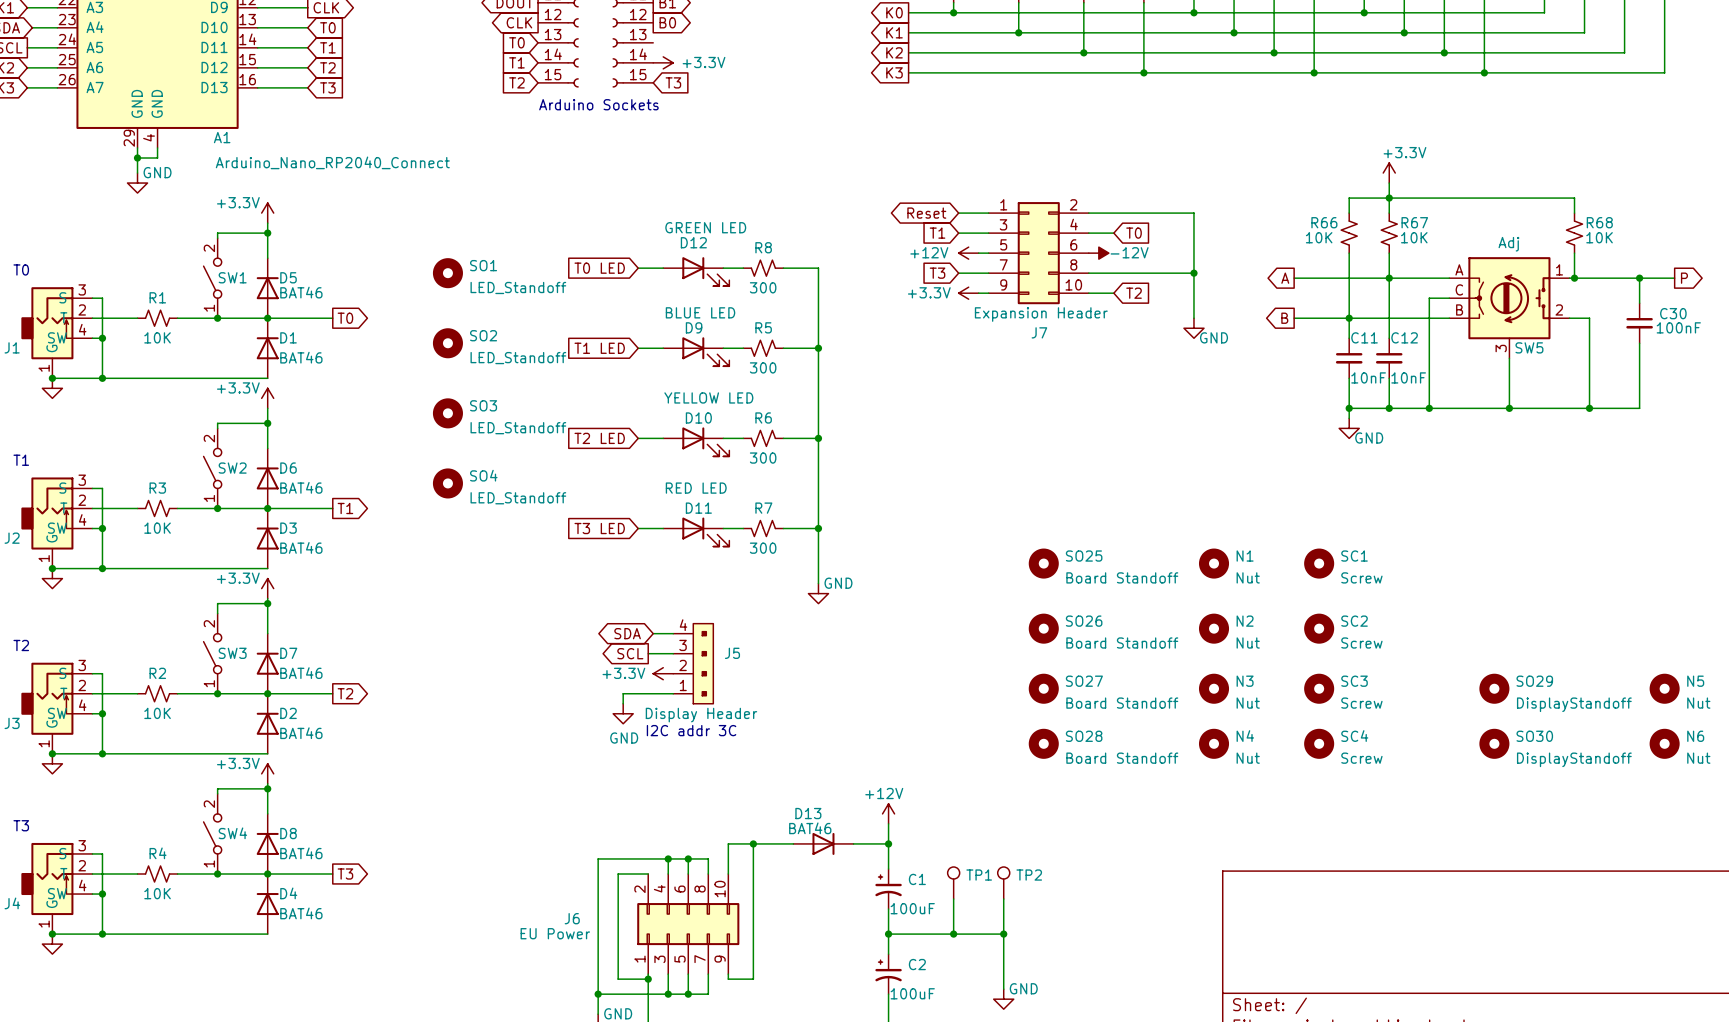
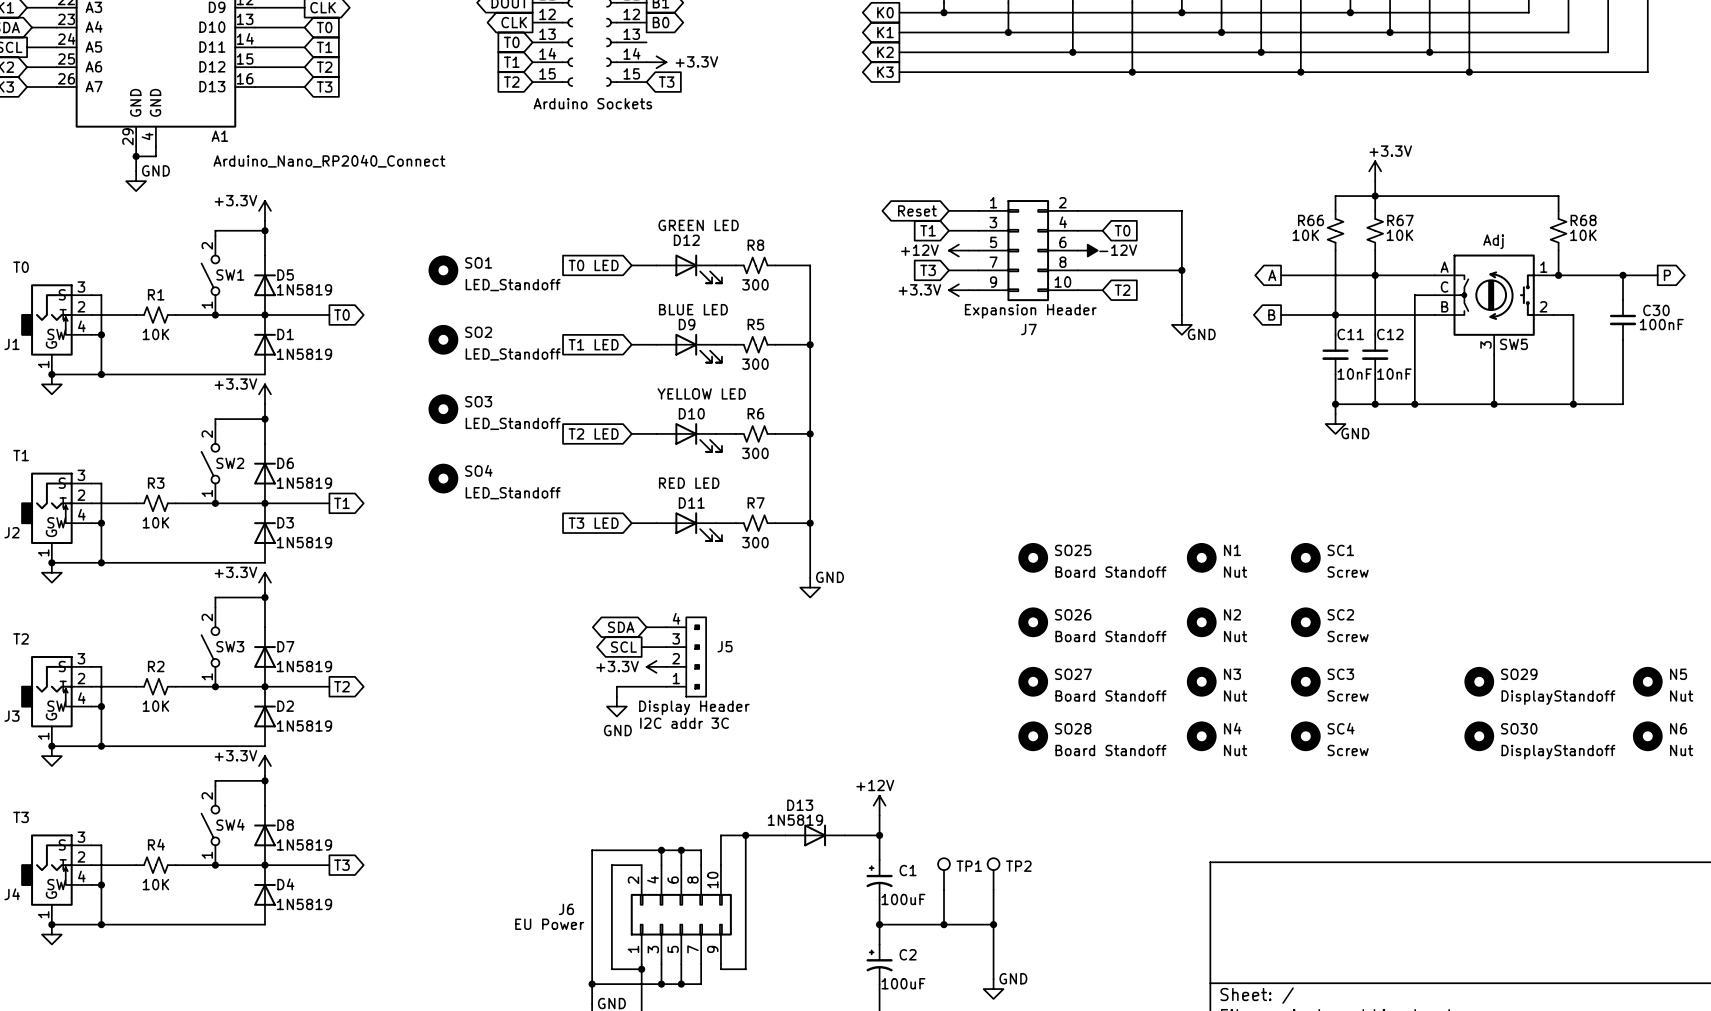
D5 value: BAT46 (301, 292) -> 1N5819 (304, 289)
D1 value: BAT46 (301, 357) -> 1N5819 (304, 354)
D6 value: BAT46 (301, 487) -> 1N5819 (304, 483)
D3 value: BAT46 (301, 547) -> 1N5819 (304, 542)
D7 value: BAT46 (301, 673) -> 1N5819 (304, 666)
D2 value: BAT46 (301, 733) -> 1N5819 (304, 726)
D13 value: BAT46 (810, 828) -> 1N5819 (795, 820)
D8 value: BAT46 (301, 853) -> 1N5819 (304, 844)
D4 value: BAT46 (301, 913) -> 1N5819 (304, 904)

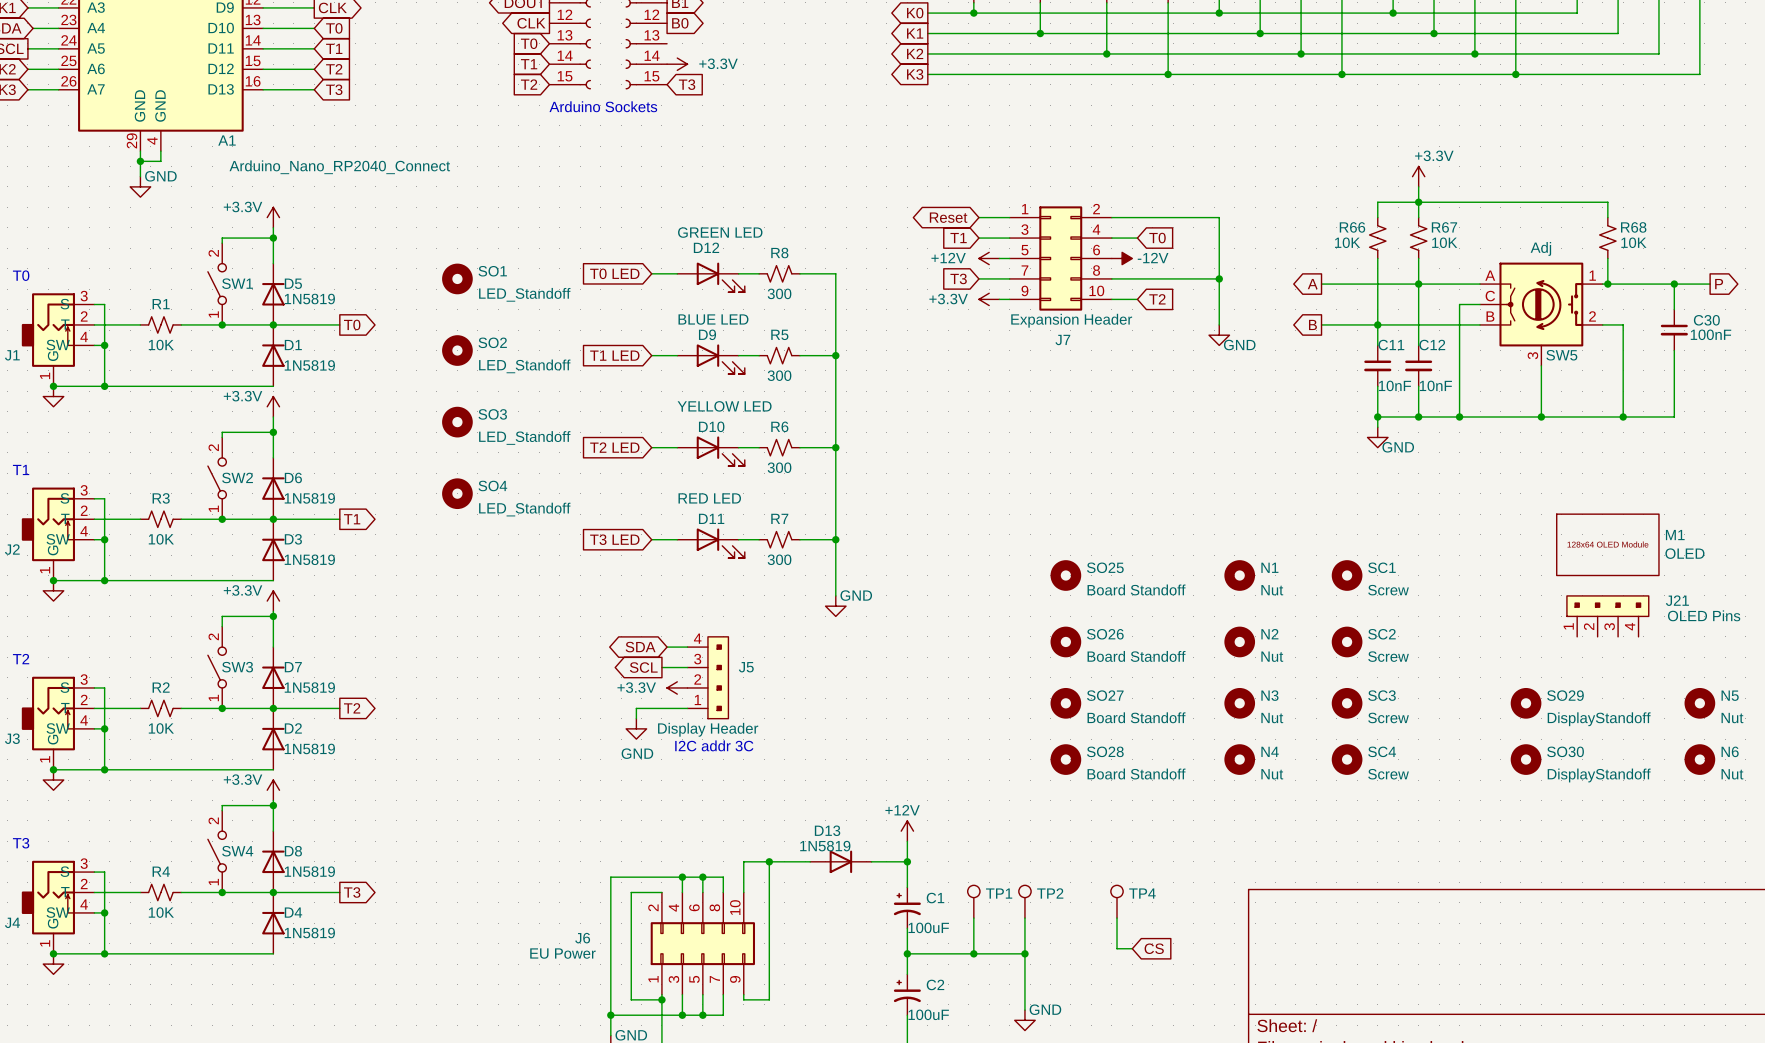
M1: none -> OLED (1607, 544)
J21: none -> OLED Pins (1607, 616)
TP4: none -> (1117, 901)
wire: none -> (1117, 918) (1117, 948) (1132, 948)
global label: none -> CS (1154, 948)

